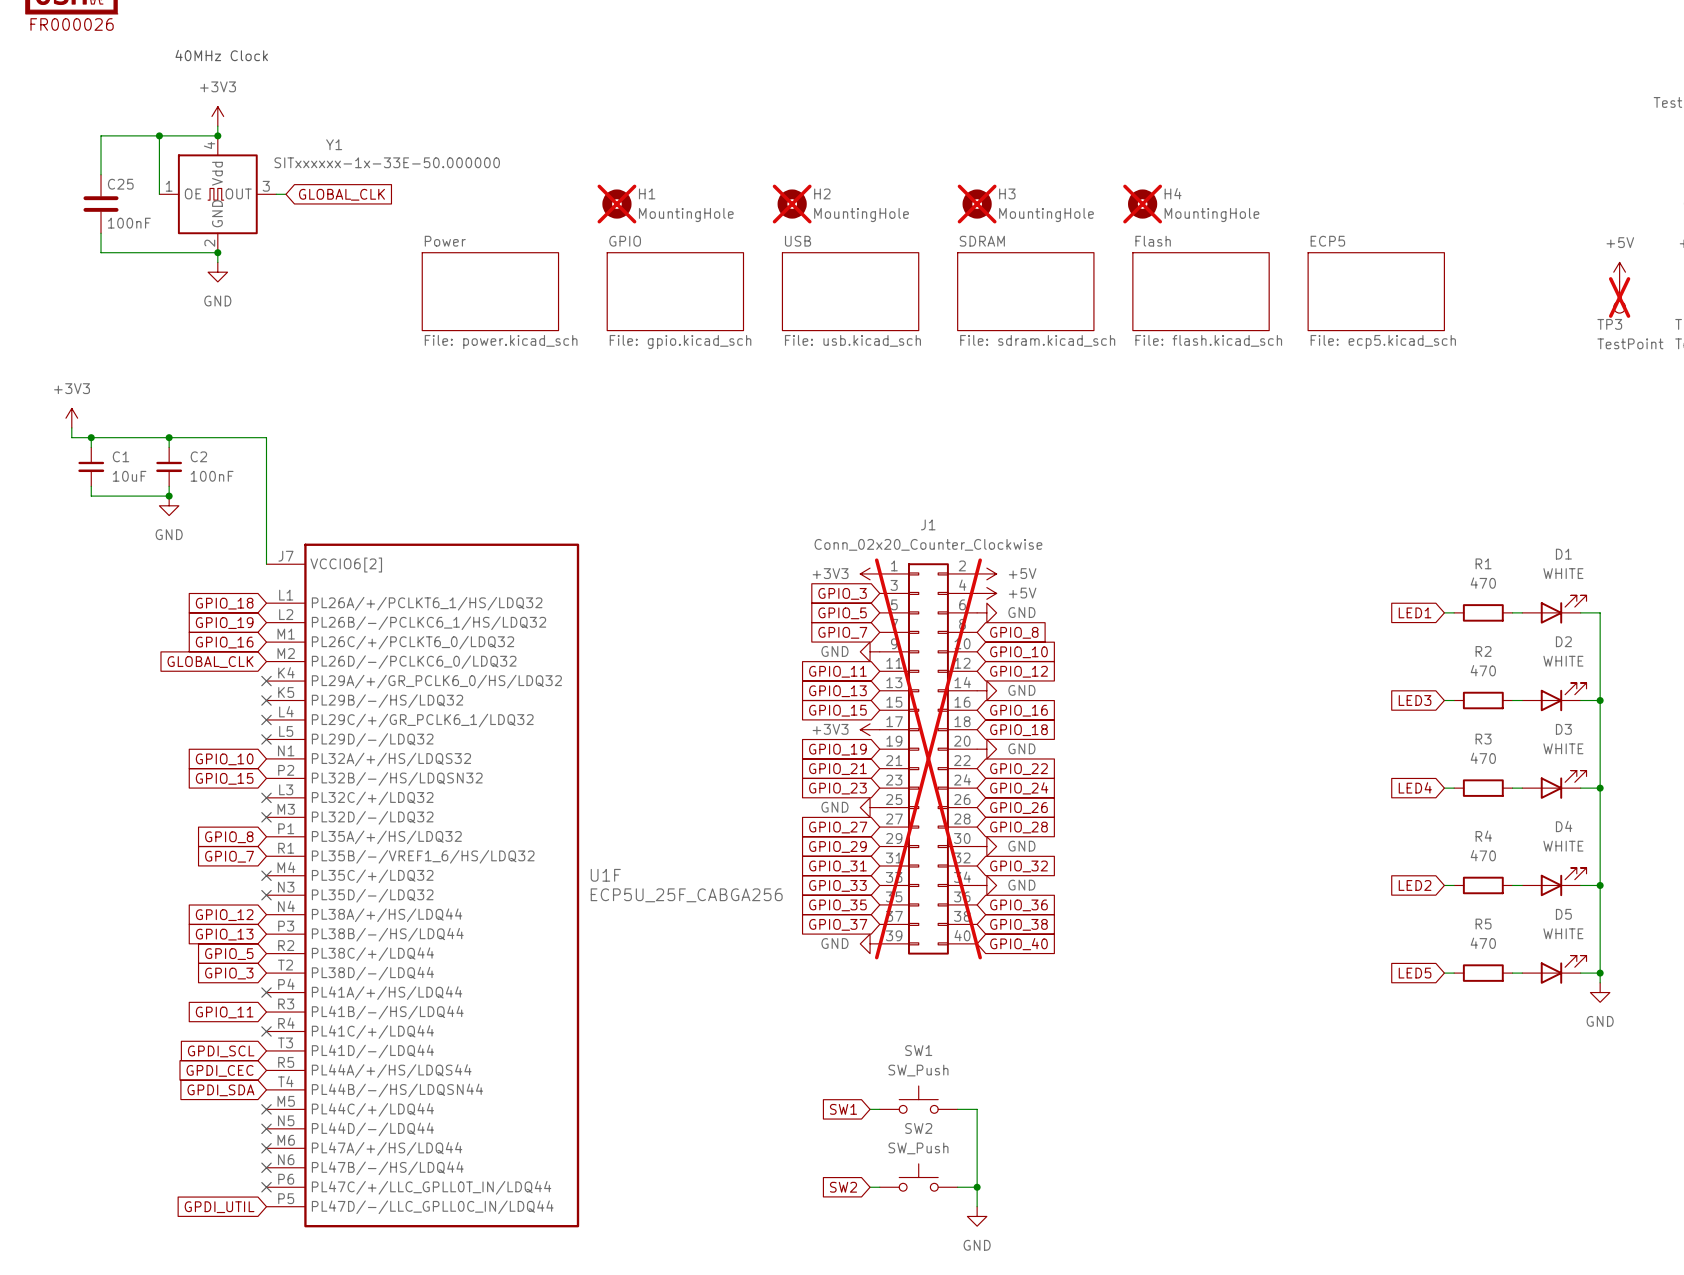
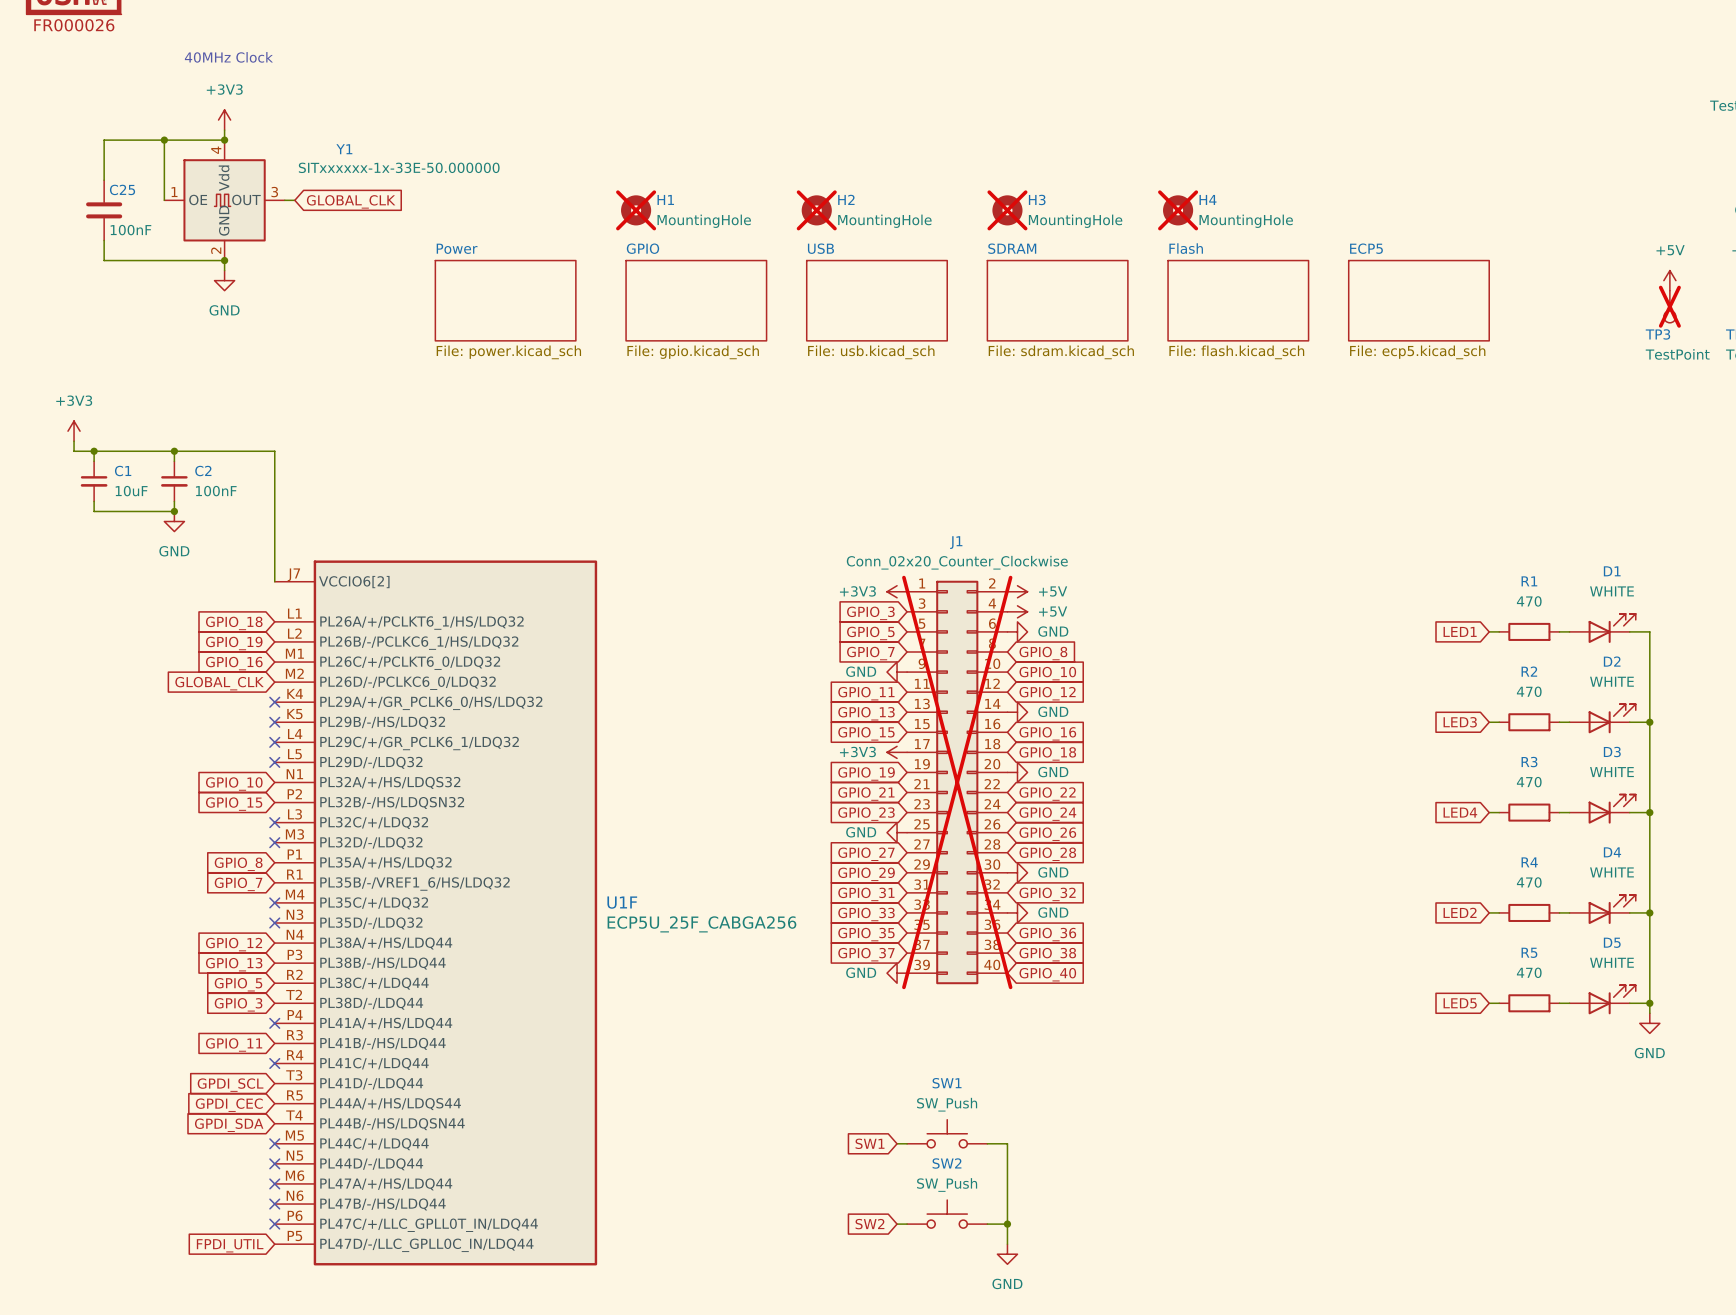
global label: GPDI_UTIL (219, 1207) -> FPDI_UTIL (230, 1245)

